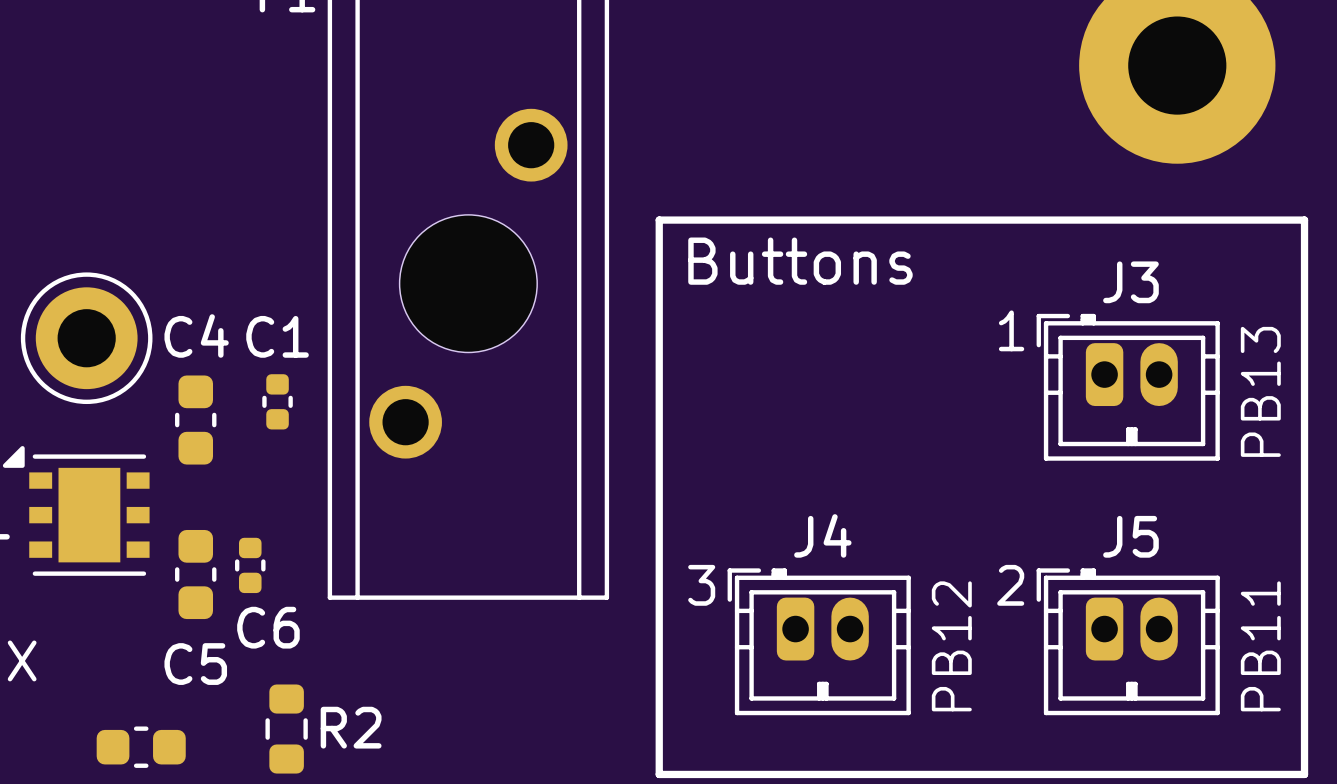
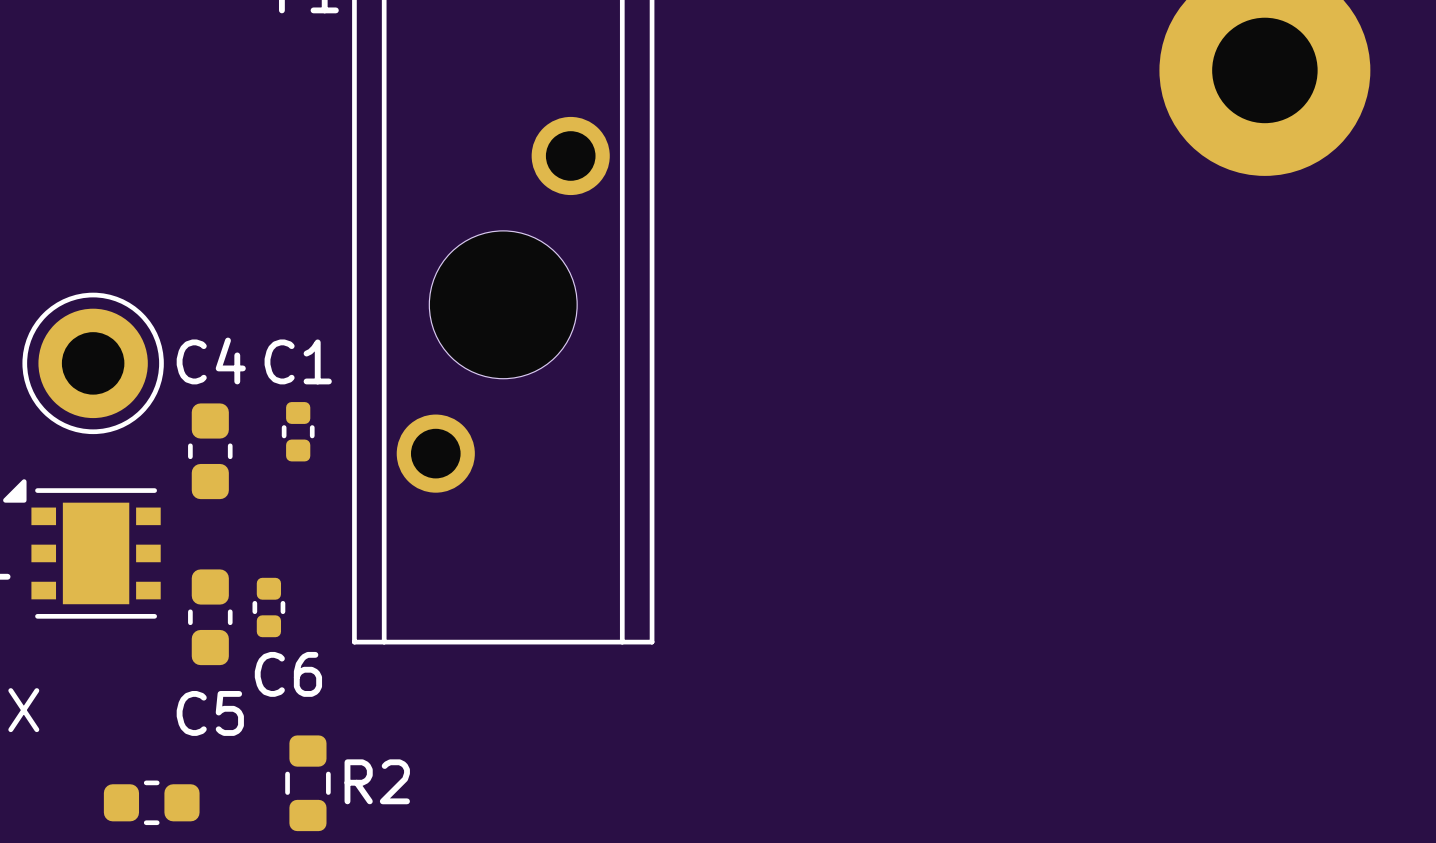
line: (659, 220) (1304, 220) (1304, 774) (659, 774) (659, 220) -> none
text: Buttons (800, 261) -> none
text: 1 (1011, 330) -> none
J3: (1128, 387) -> none
text: PB13 (1260, 391) -> none
text: 3 (701, 585) -> none
text: 2 (1010, 585) -> none
J4: (819, 641) -> none
J5: (1128, 641) -> none
text: PB12 (951, 646) -> none
text: PB11 (1260, 646) -> none

